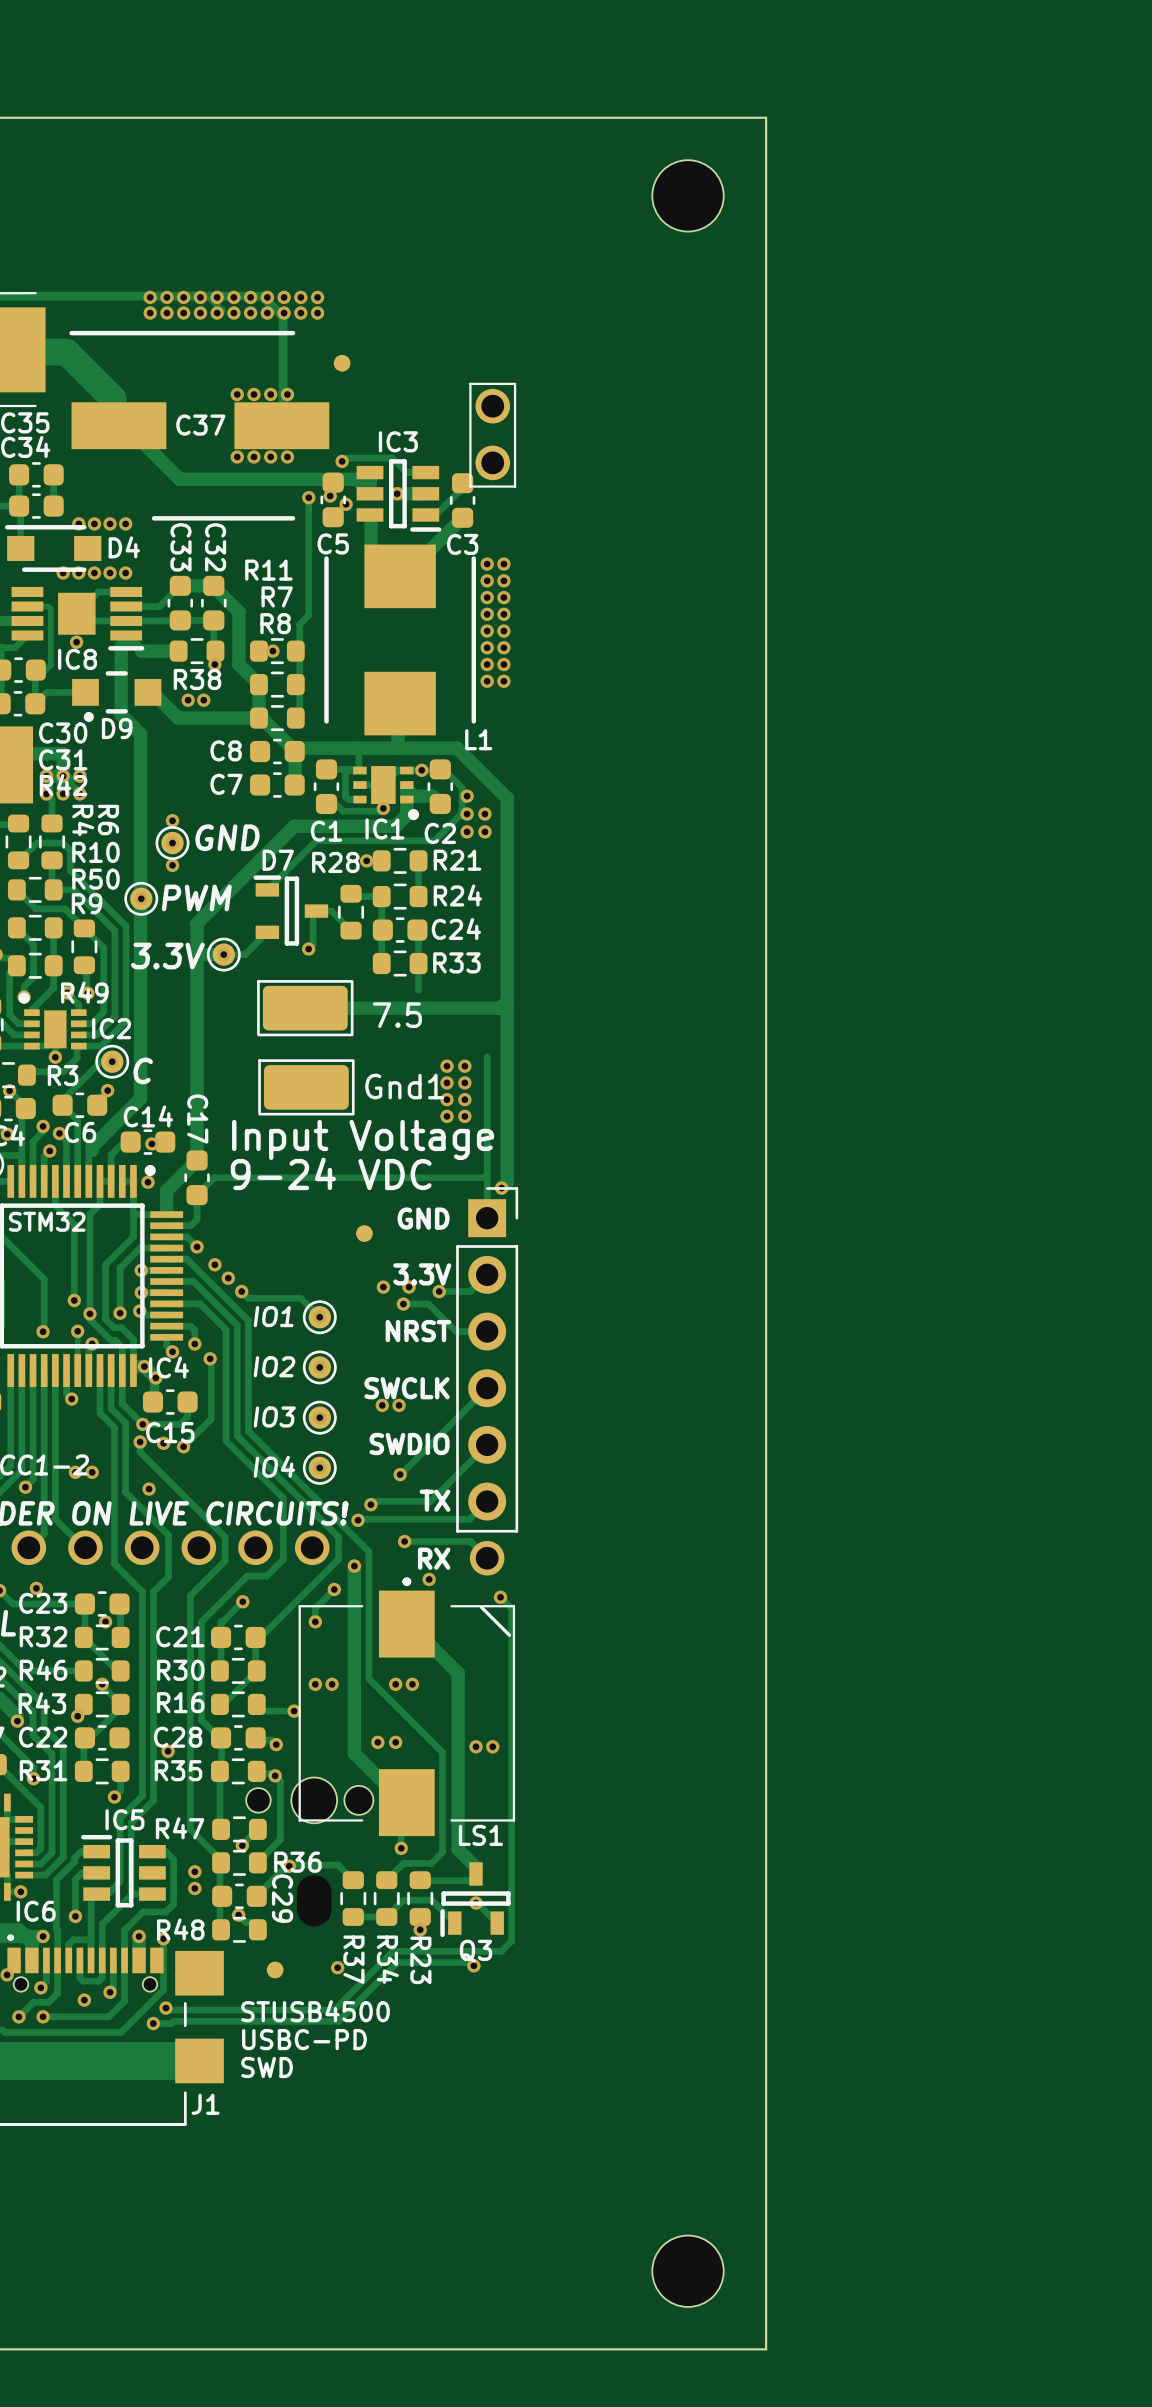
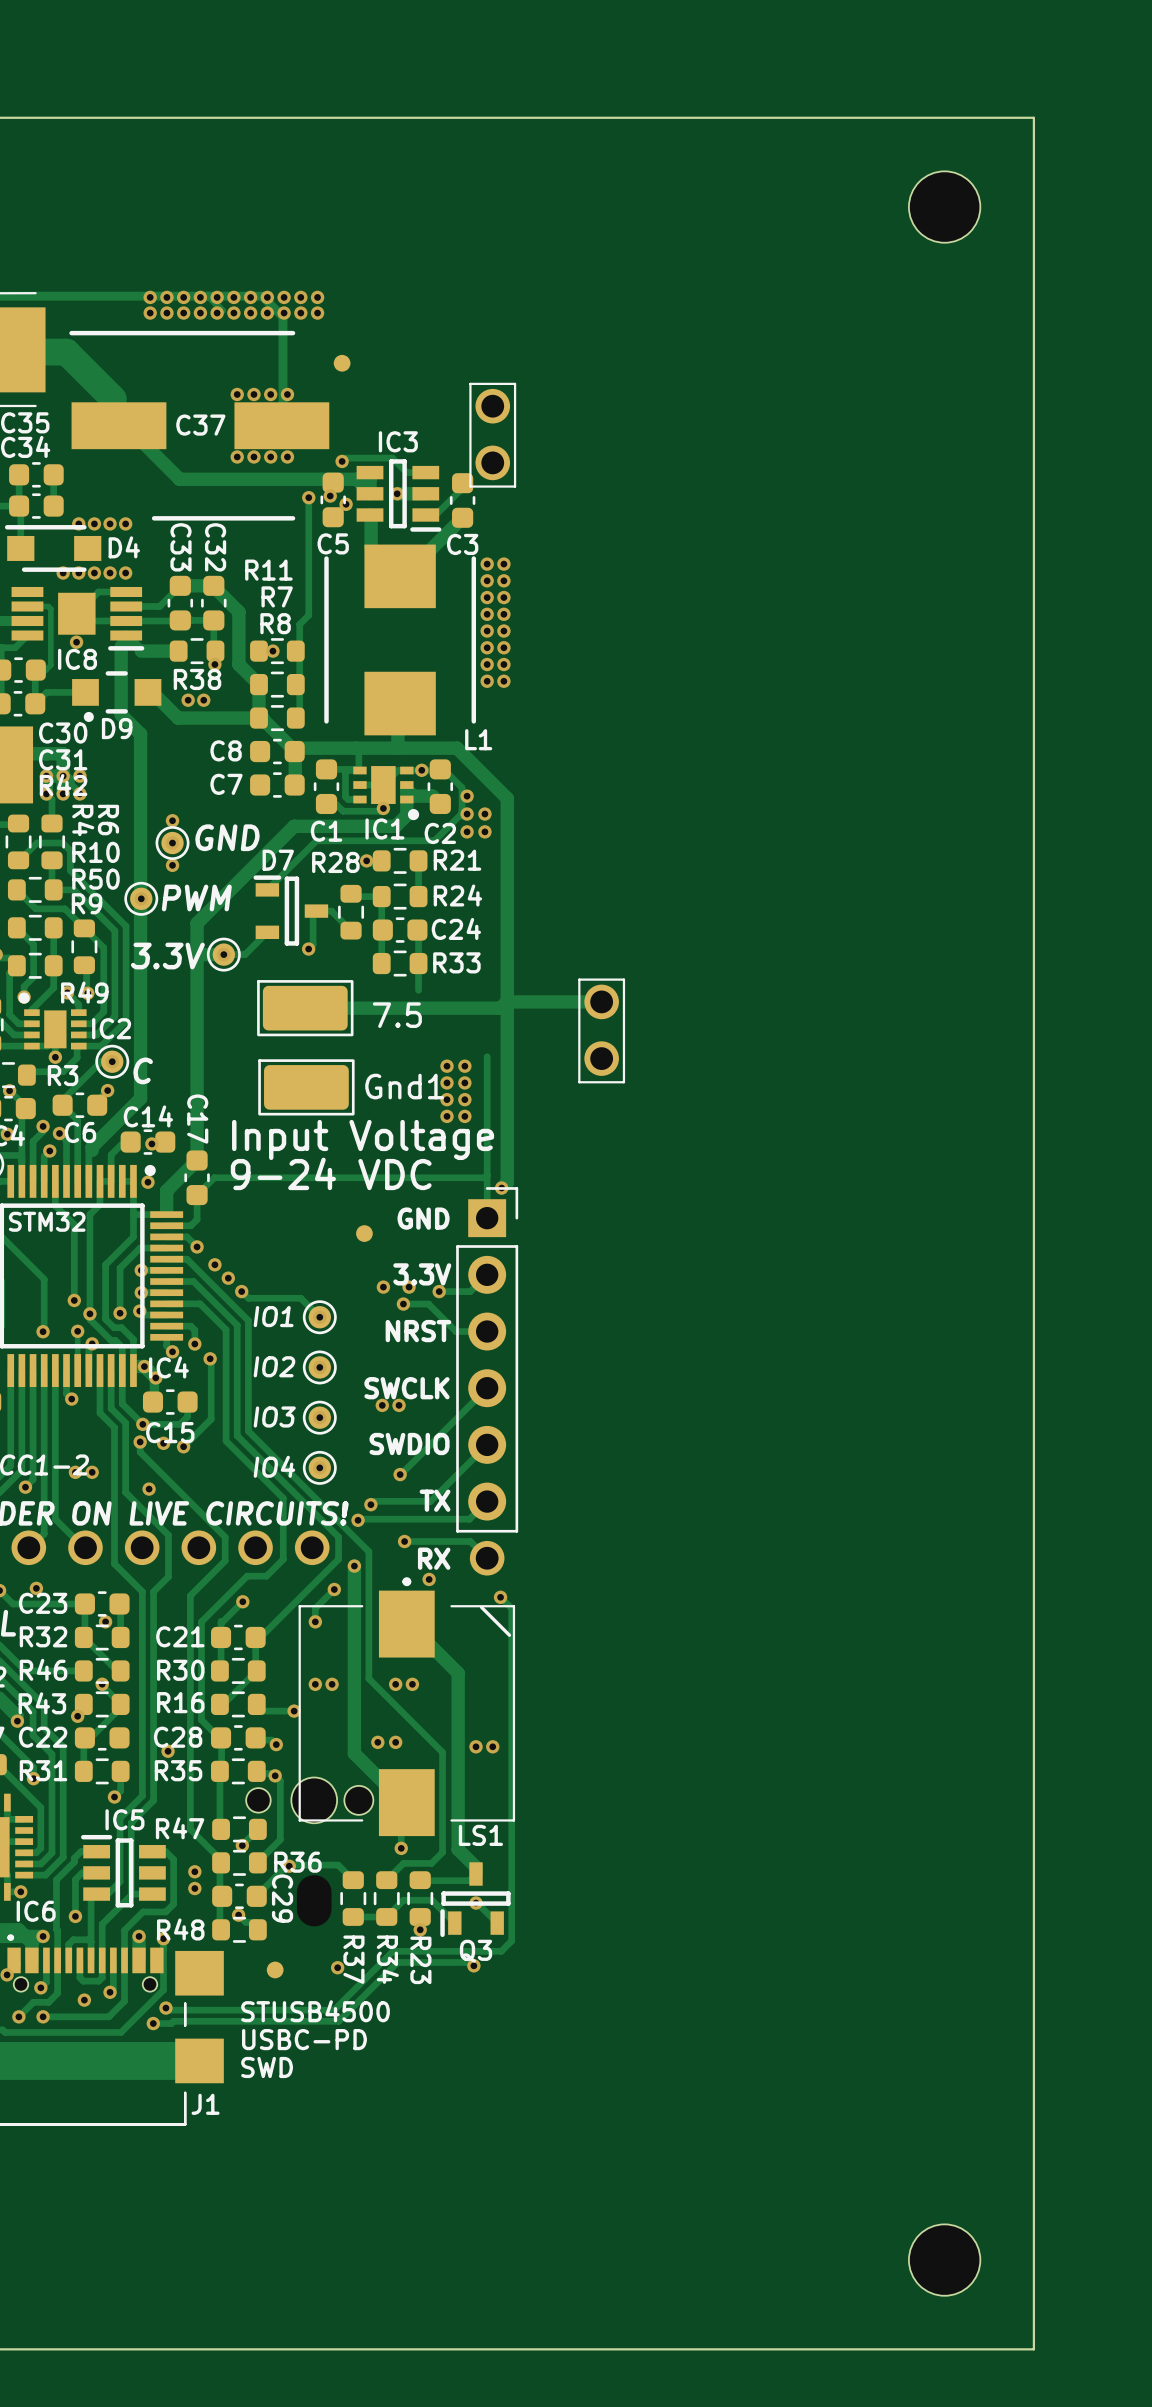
board edge: (766, 117) (766, 2349) -> (766, 117) (1033, 117) (1033, 2349) (766, 2349)
part position: (688, 195) -> (944, 207)
track: none -> (507, 1001) (601, 1001)
part: none -> (601, 1030)
part position: (688, 2271) -> (944, 2260)

